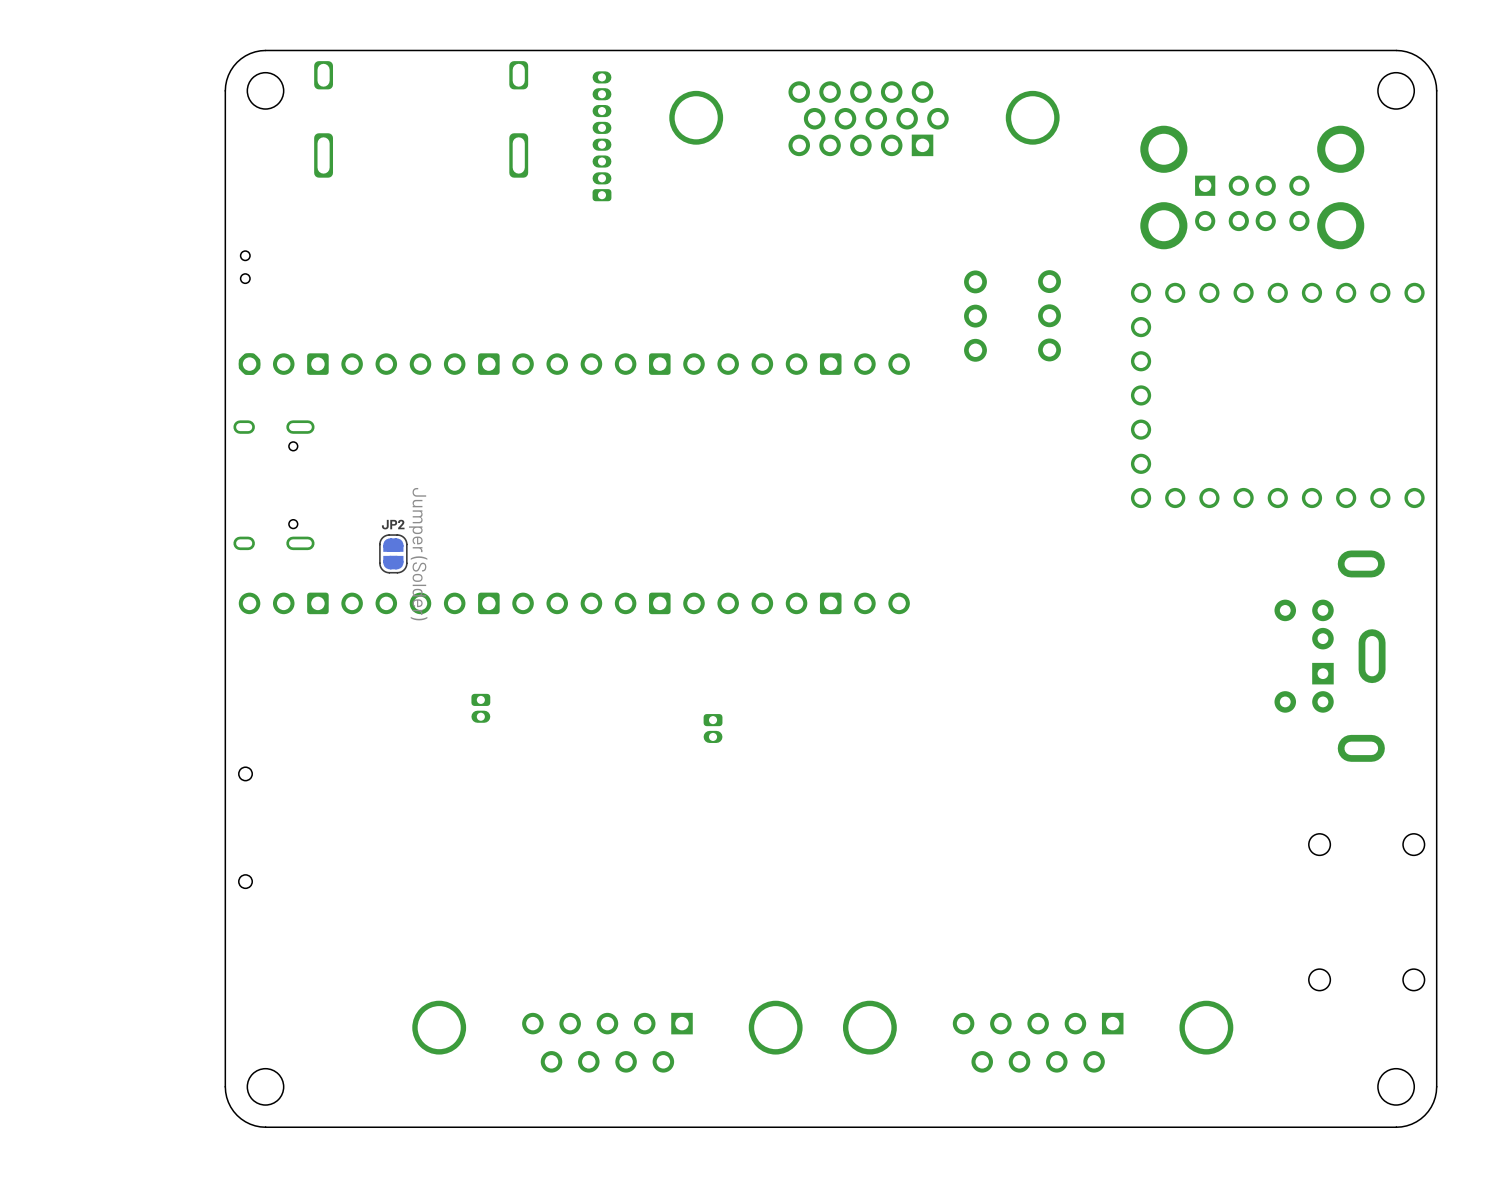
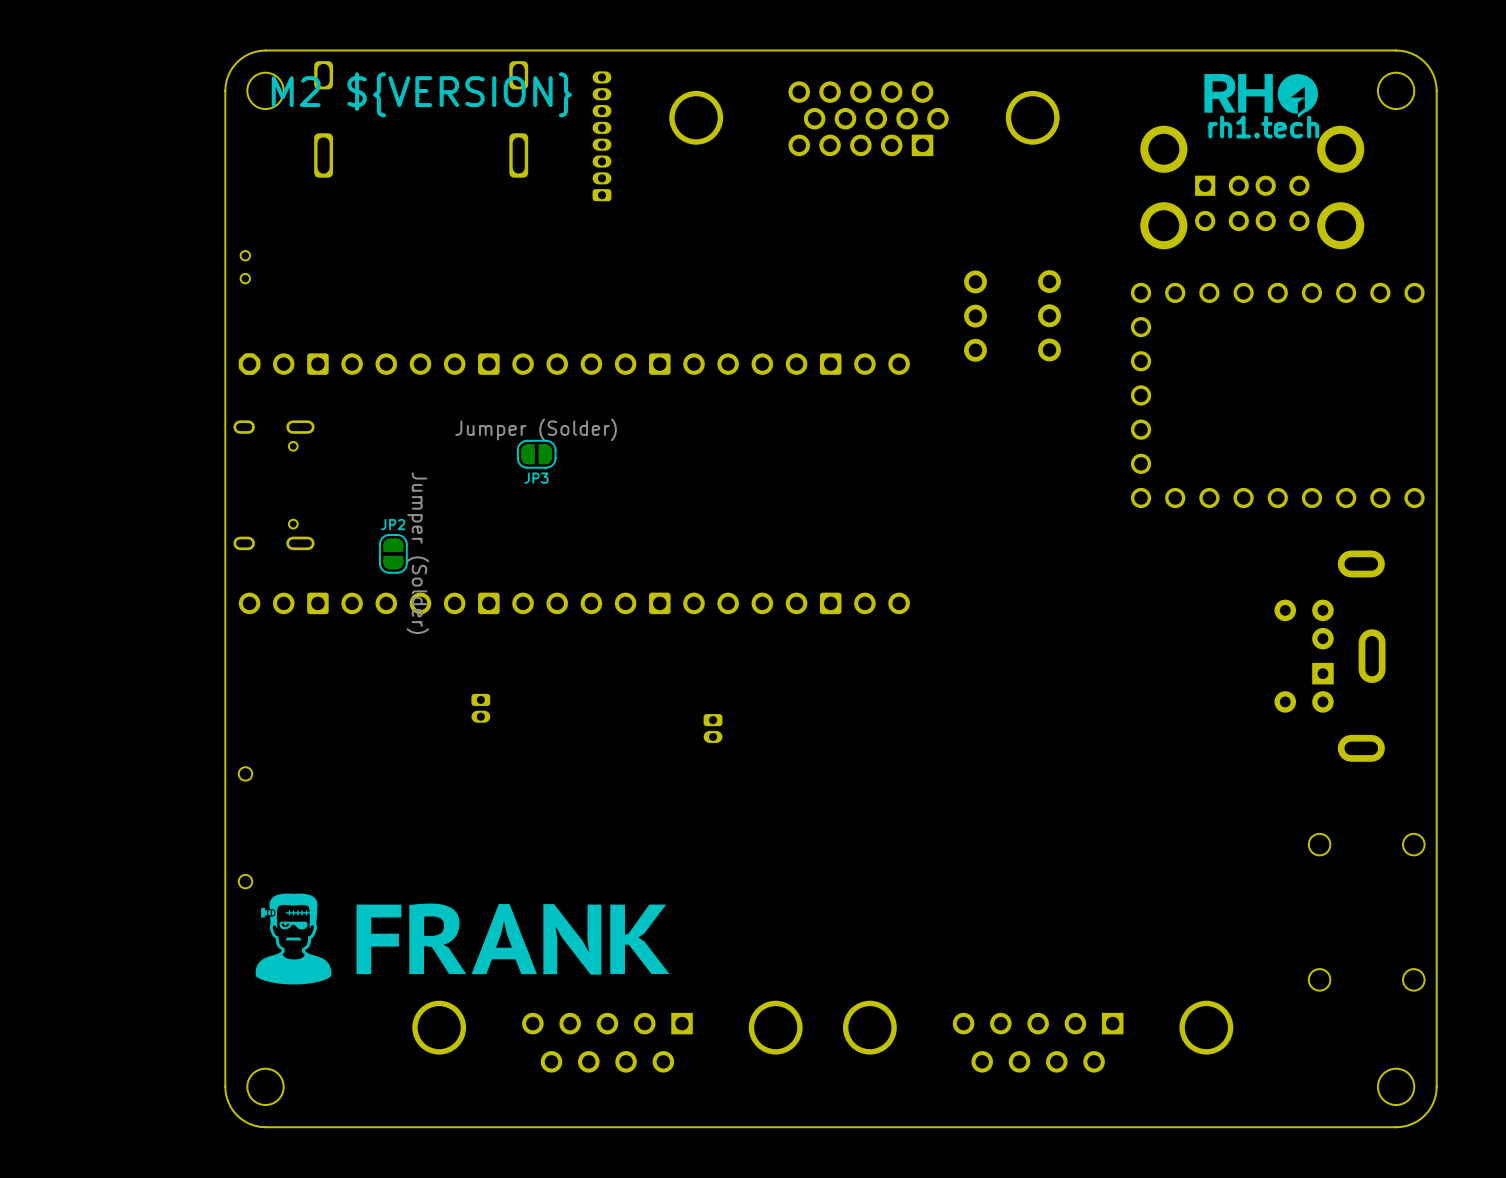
drawing: none -> [1204, 74, 1318, 118]
text: none -> M2 ${VERSION} (421, 94)
text: none -> rh1.tech (1263, 127)
JP3: none -> Jumper (Solder) (536, 454)
drawing: none -> [255, 893, 332, 985]
drawing: none -> [356, 903, 670, 975]

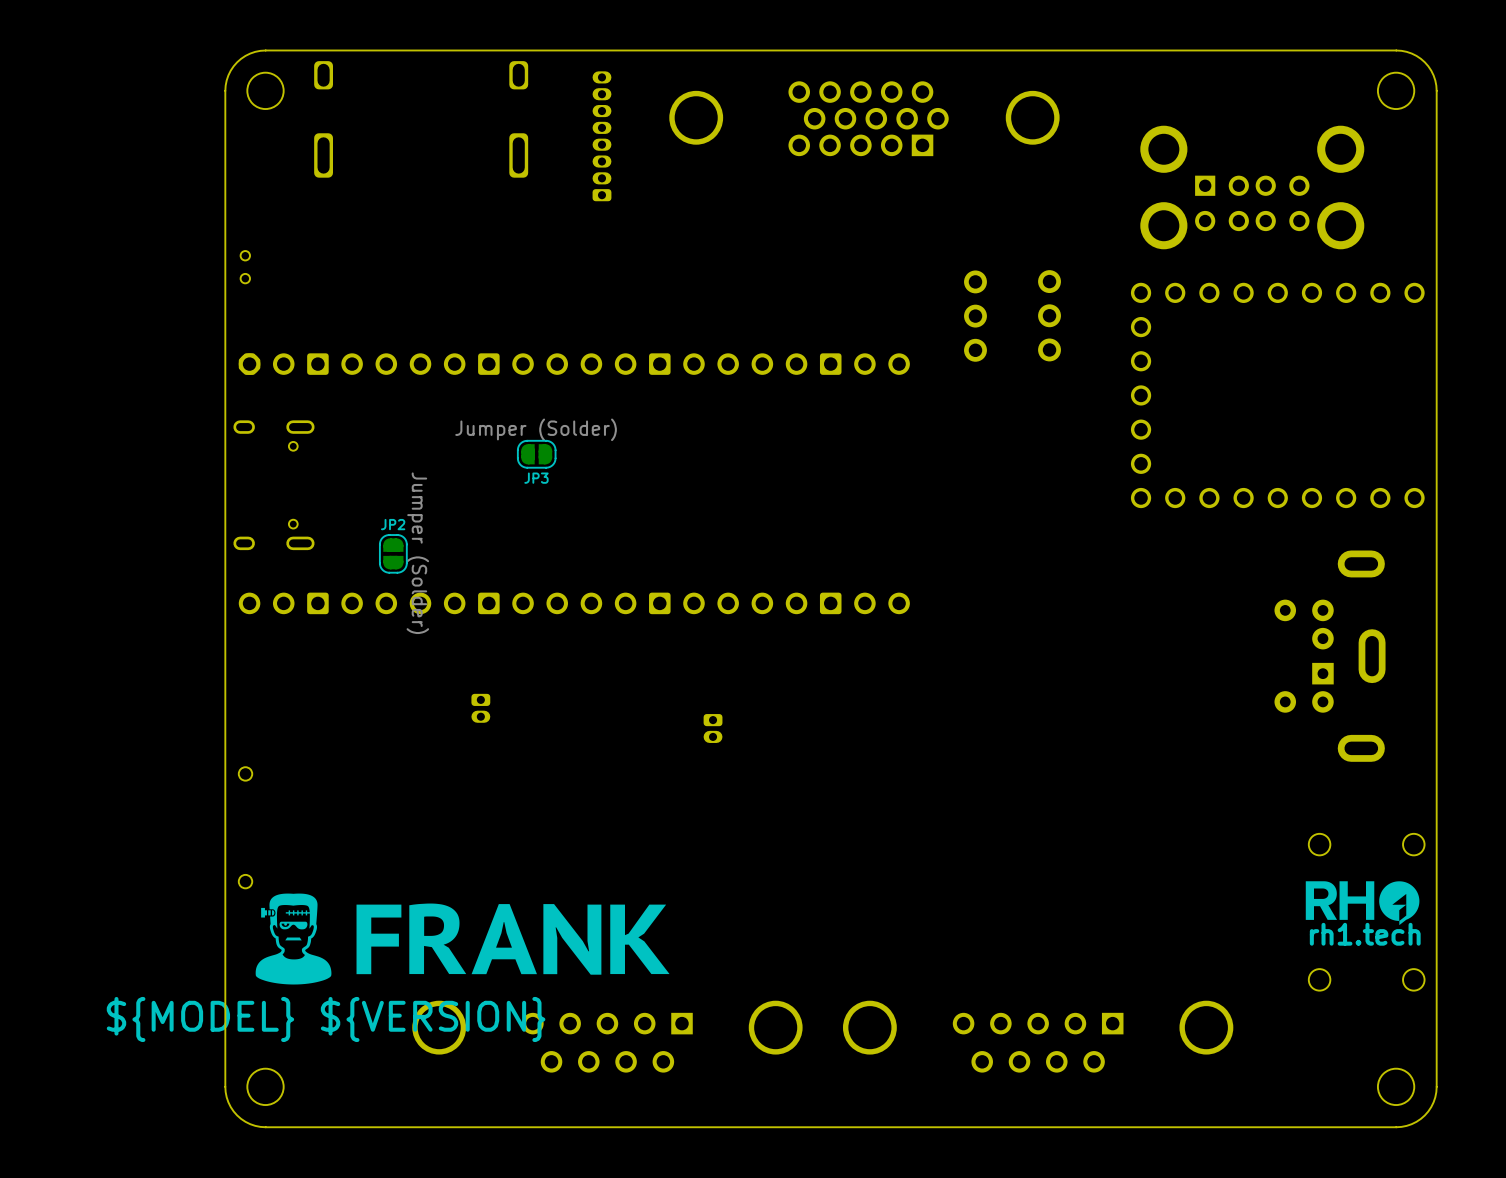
drawing: [1204, 74, 1318, 118] -> none
text: M2 ${VERSION} (421, 94) -> none
text: rh1.tech (1263, 127) -> none
drawing: none -> [1305, 881, 1420, 926]
text: none -> rh1.tech (1365, 934)
text: none -> ${MODEL} ${VERSION} (326, 1019)

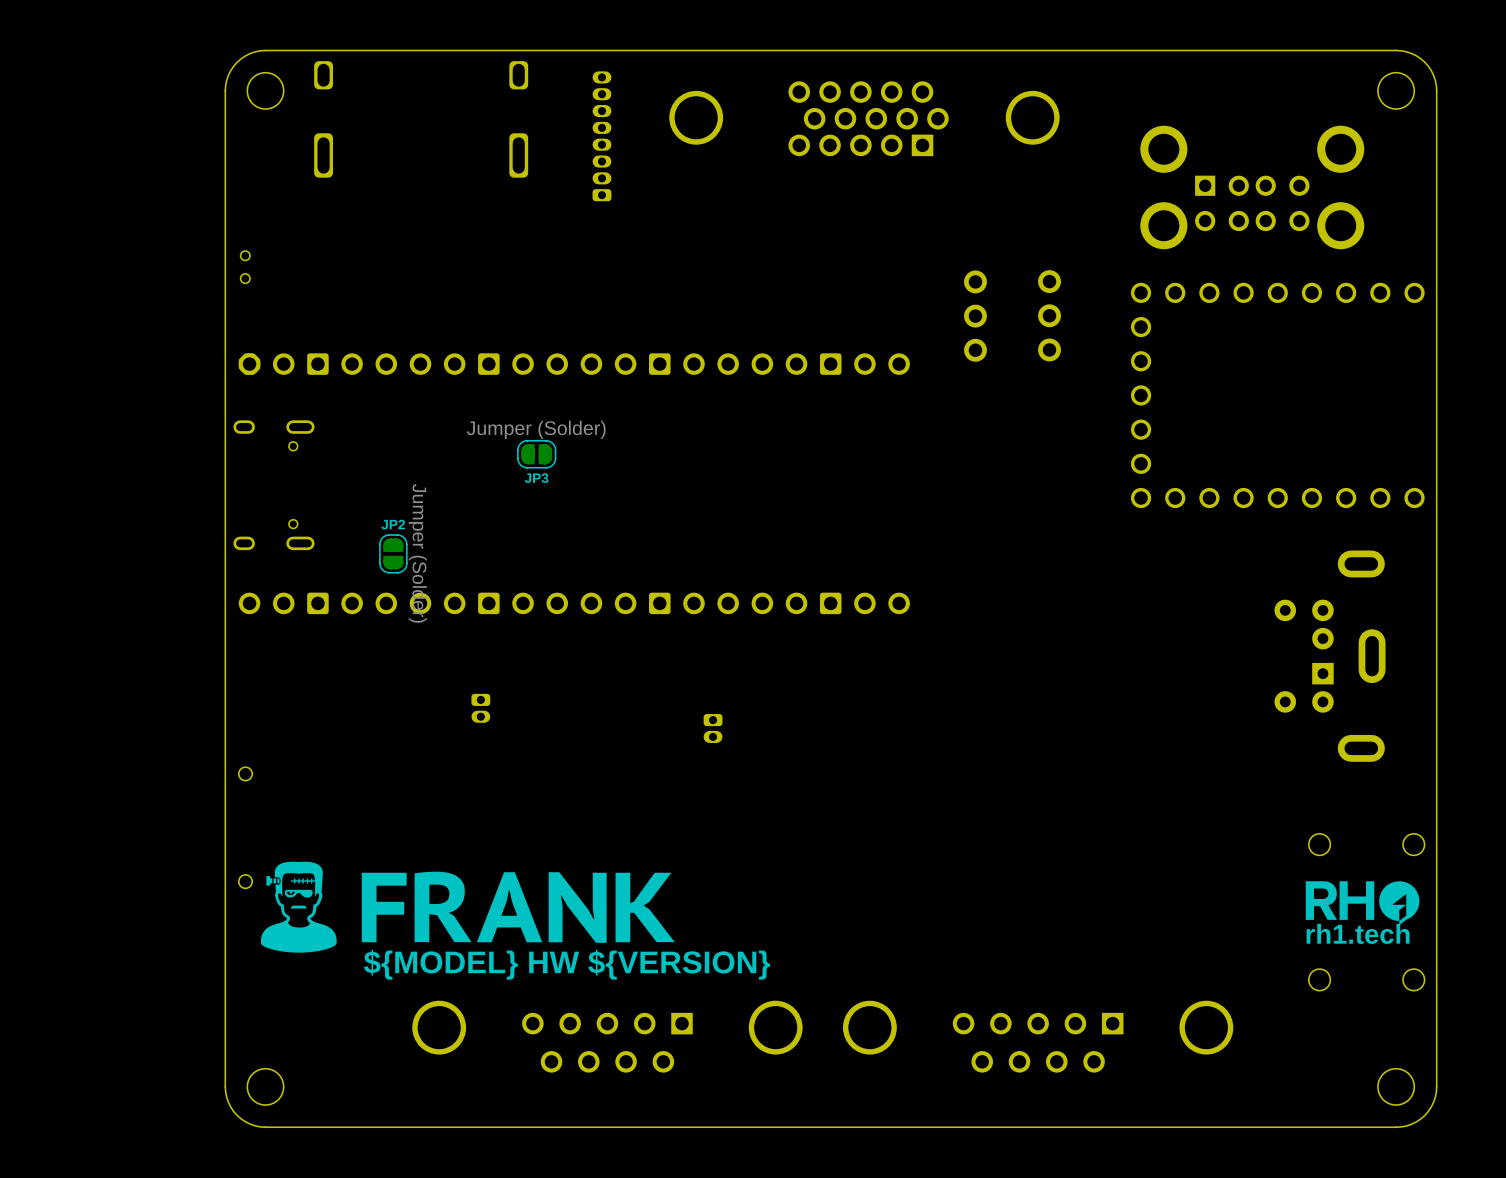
drawing position: (264, 912) -> (269, 880)
drawing position: (269, 912) -> (274, 880)
drawing position: (273, 912) -> (278, 880)
drawing position: (293, 925) -> (298, 893)
drawing position: (293, 938) -> (298, 907)
drawing position: (437, 938) -> (443, 906)
drawing position: (293, 939) -> (298, 907)
drawing position: (378, 939) -> (384, 907)
drawing position: (504, 939) -> (509, 907)
drawing position: (572, 939) -> (577, 907)
drawing position: (639, 939) -> (645, 907)
text: none -> ${MODEL} HW ${VERSION} (567, 964)
text: ${MODEL} ${VERSION} (326, 1019) -> none

